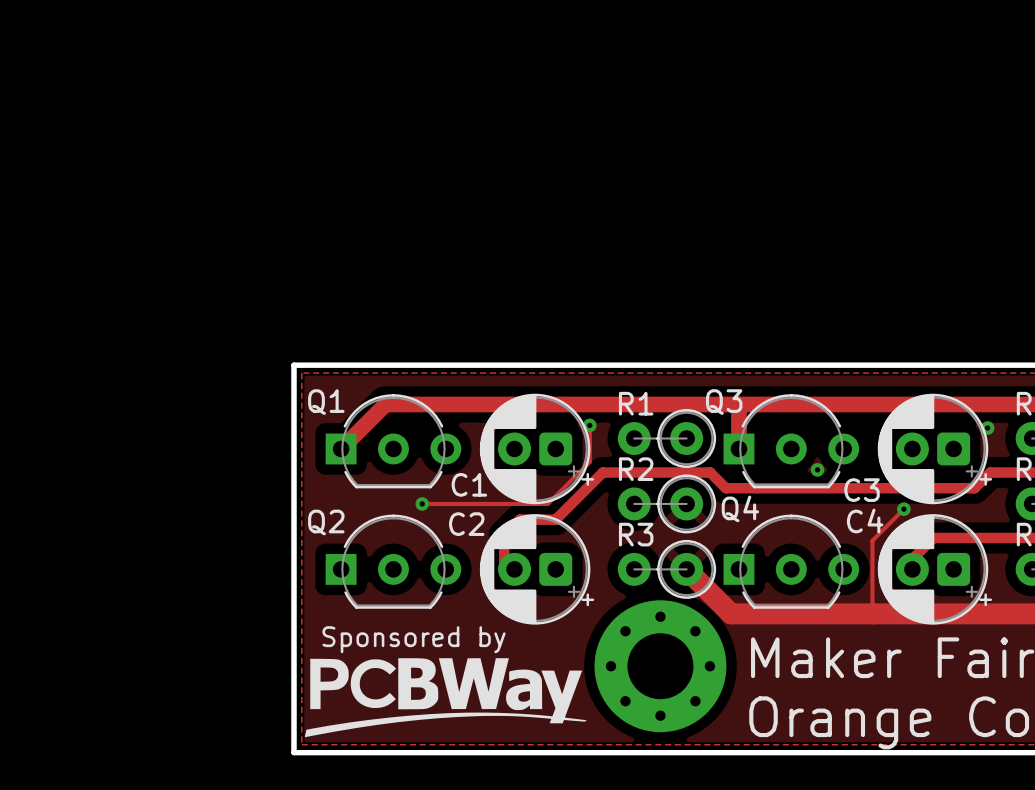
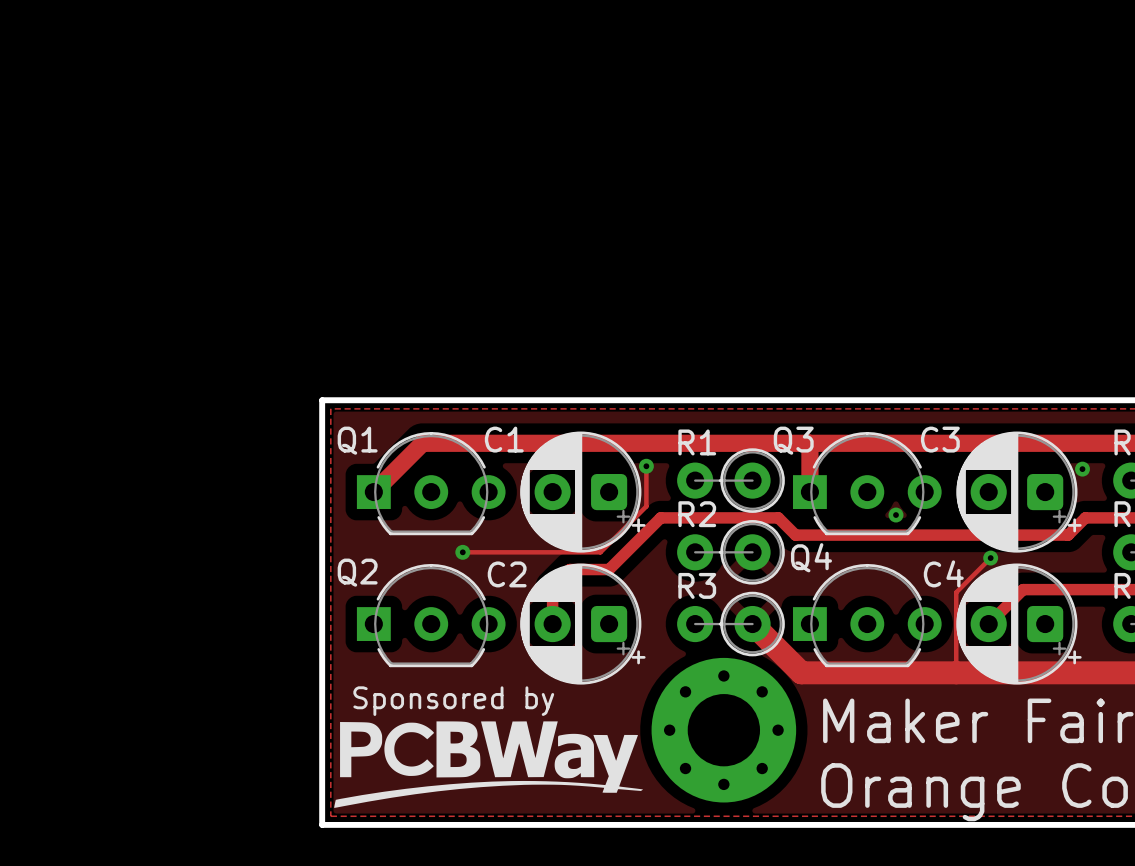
C1 footprint: [479, 393, 595, 505] -> [520, 431, 646, 553]
C3 footprint: [877, 393, 993, 505] -> [956, 431, 1082, 553]
C1 name position: C1 (469, 484) -> C1 (504, 439)
C3 name position: C3 (862, 490) -> C3 (940, 439)
C2 footprint: [479, 514, 595, 625] -> [520, 563, 646, 685]
C4 footprint: [877, 514, 993, 625] -> [956, 563, 1082, 685]

